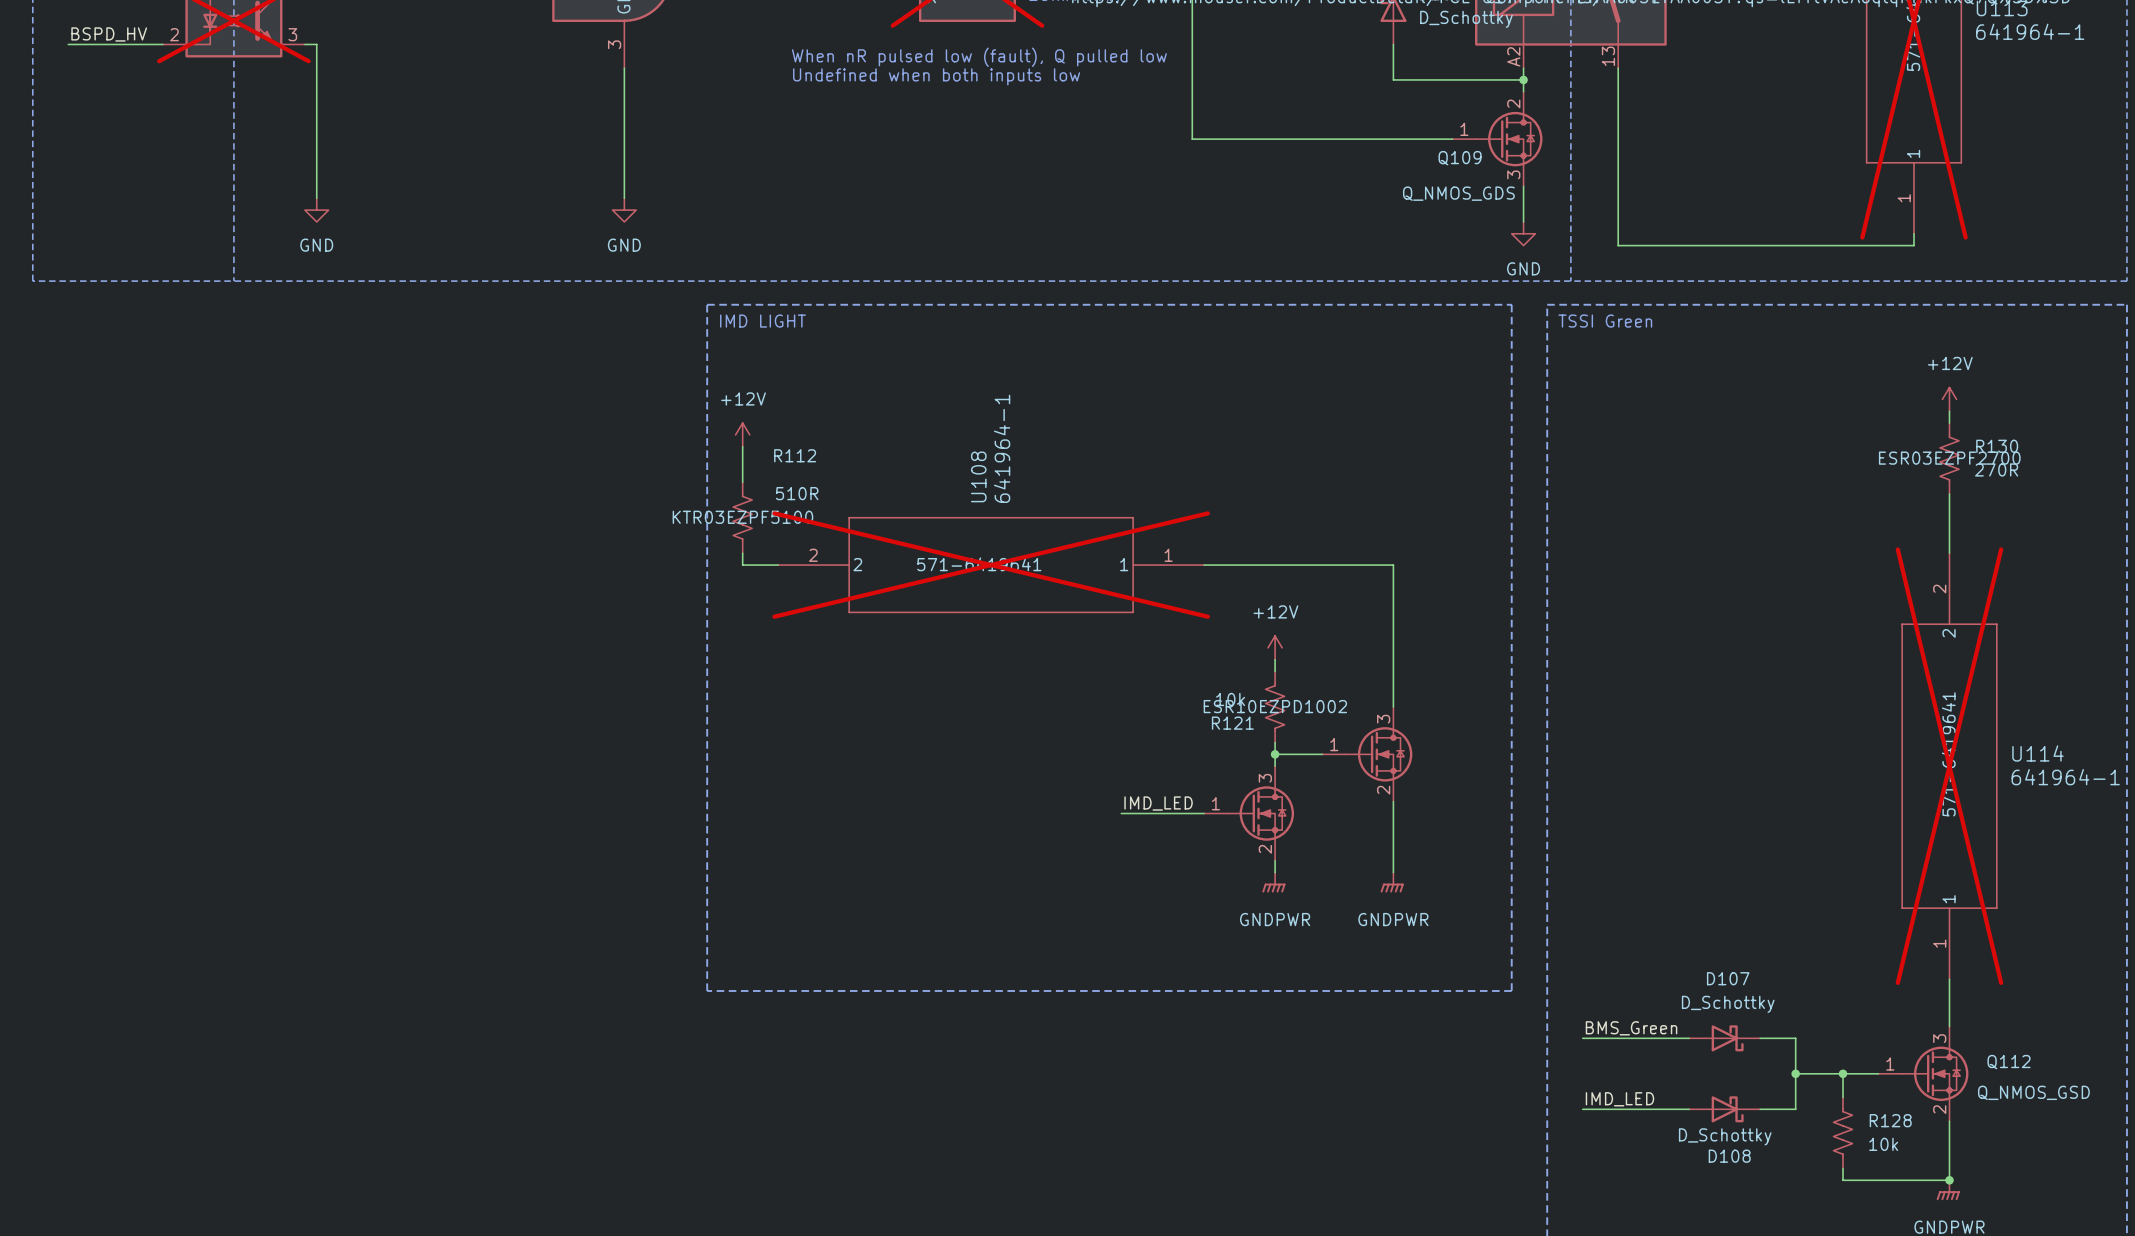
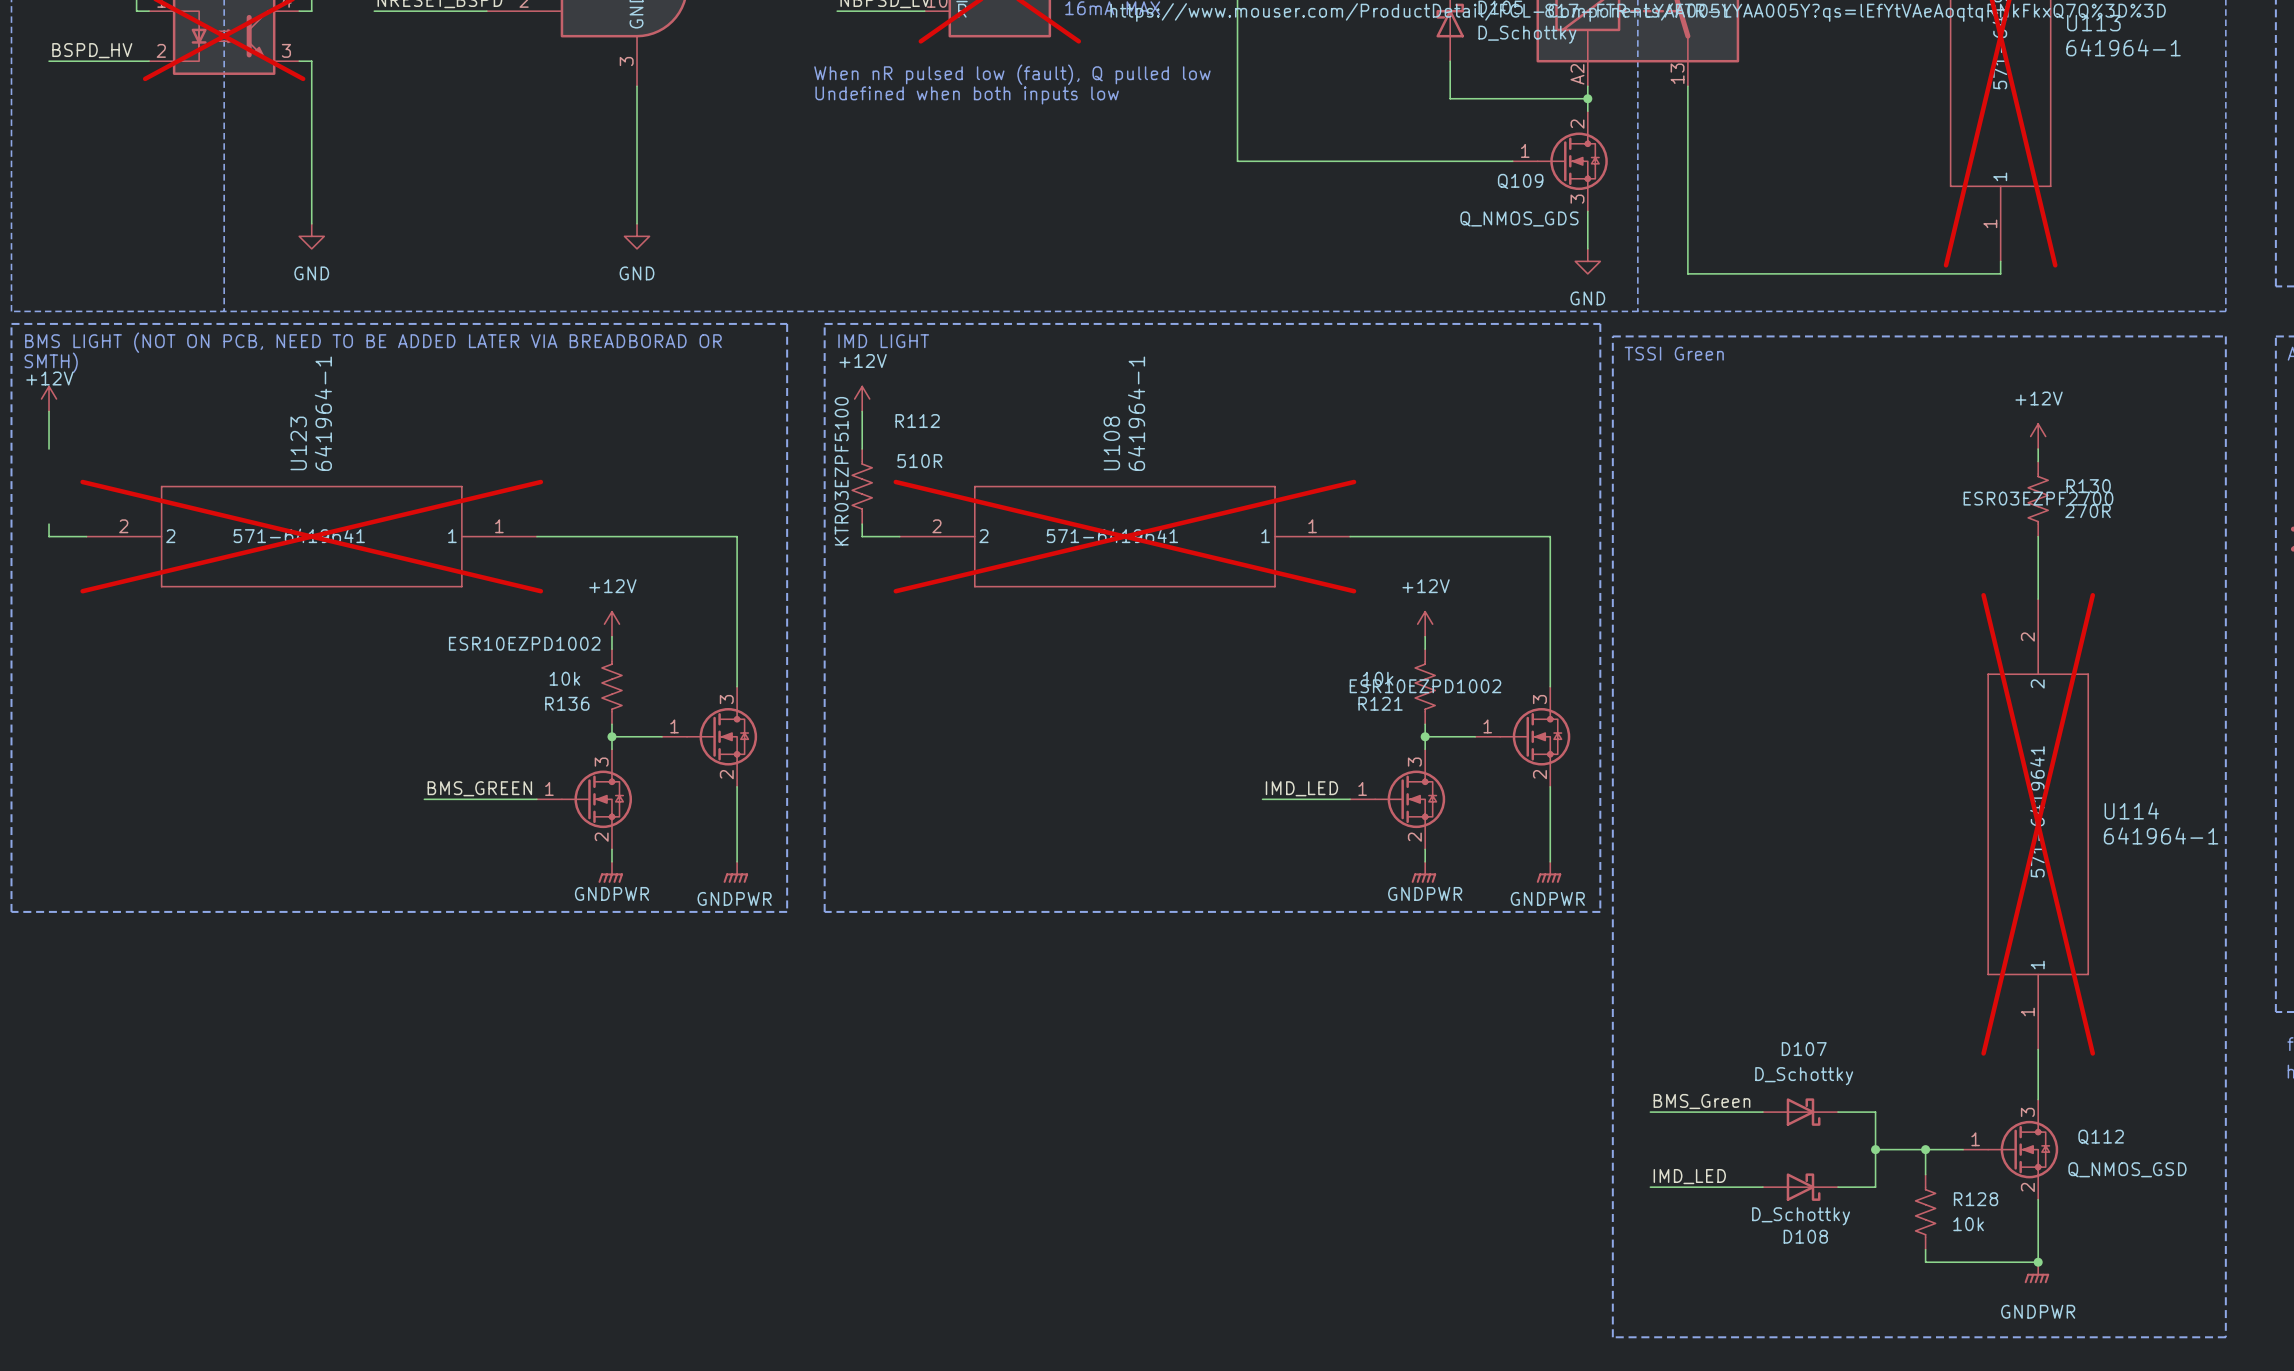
line: none -> (11, 323) (787, 323) (787, 911) (11, 911) (11, 323)
line: (707, 304) (1511, 304) (1511, 990) (707, 990) (707, 304) -> (824, 323) (824, 911) (1600, 911) (1600, 323) (824, 323)
text: none -> BMS LIGHT (NOT ON PCB, NEED TO BE ADDED LATER VIA BREADBORAD OR (373, 342)
text position: IMD LIGHT (763, 321) -> IMD LIGHT (883, 341)
text: none -> SMTH) (51, 362)
power symbol: none -> +12V (49, 398)
power symbol: none -> +12V (862, 398)
wire: none -> (49, 411) (49, 449)
power symbol: +12V (742, 434) -> none
wire: (742, 446) (742, 482) -> (862, 411) (862, 449)
wire: none -> (49, 524) (49, 536) (86, 536)
U123: none -> 641964-1 (311, 536)
wire: none -> (536, 536) (737, 536) (737, 686)
R112 position: (742, 517) -> (862, 486)
R112 text rotation: 0° (742, 517) -> 90° counterclockwise (841, 471)
wire: (742, 553) (742, 565) (778, 565) -> (862, 524) (862, 536) (899, 536)
U108 position: (991, 565) -> (1124, 536)
wire: (1204, 565) (1393, 565) (1393, 707) -> (1350, 536) (1550, 536) (1550, 686)
power symbol: none -> +12V (611, 624)
wire: none -> (611, 636) (611, 649)
R136: none -> 10k (611, 686)
power symbol position: +12V (1275, 647) -> +12V (1425, 624)
wire: (1275, 659) (1275, 671) -> (1425, 636) (1425, 649)
wire: none -> (611, 724) (611, 749)
wire: none -> (611, 736) (662, 736)
junction: none -> (611, 736)
part: none -> (709, 736)
junction: none -> (1425, 736)
part: none -> (1522, 736)
R121 position: (1275, 707) -> (1425, 686)
wire: none -> (737, 786) (737, 861)
label: none -> BMS_GREEN (479, 788)
wire: none -> (424, 799) (536, 799)
part: none -> (584, 799)
wire: (1275, 742) (1275, 766) -> (1425, 724) (1425, 749)
wire: (1275, 754) (1322, 754) -> (1425, 736) (1475, 736)
junction: (1275, 754) -> none
part position: (1367, 754) -> (1397, 799)
wire: none -> (611, 849) (611, 861)
wire: (1393, 801) (1393, 872) -> (1550, 786) (1550, 861)
label position: IMD_LED (1158, 803) -> IMD_LED (1301, 788)
power symbol: none -> GNDPWR (610, 872)
power symbol: none -> GNDPWR (735, 872)
power symbol: none -> GNDPWR (1423, 872)
power symbol: none -> GNDPWR (1549, 872)
wire: (1121, 813) (1204, 813) -> (1262, 799) (1350, 799)
part: (1249, 813) -> none
wire: (1275, 860) (1275, 872) -> (1425, 849) (1425, 861)
power symbol: GNDPWR (1273, 882) -> none
power symbol: GNDPWR (1392, 882) -> none

